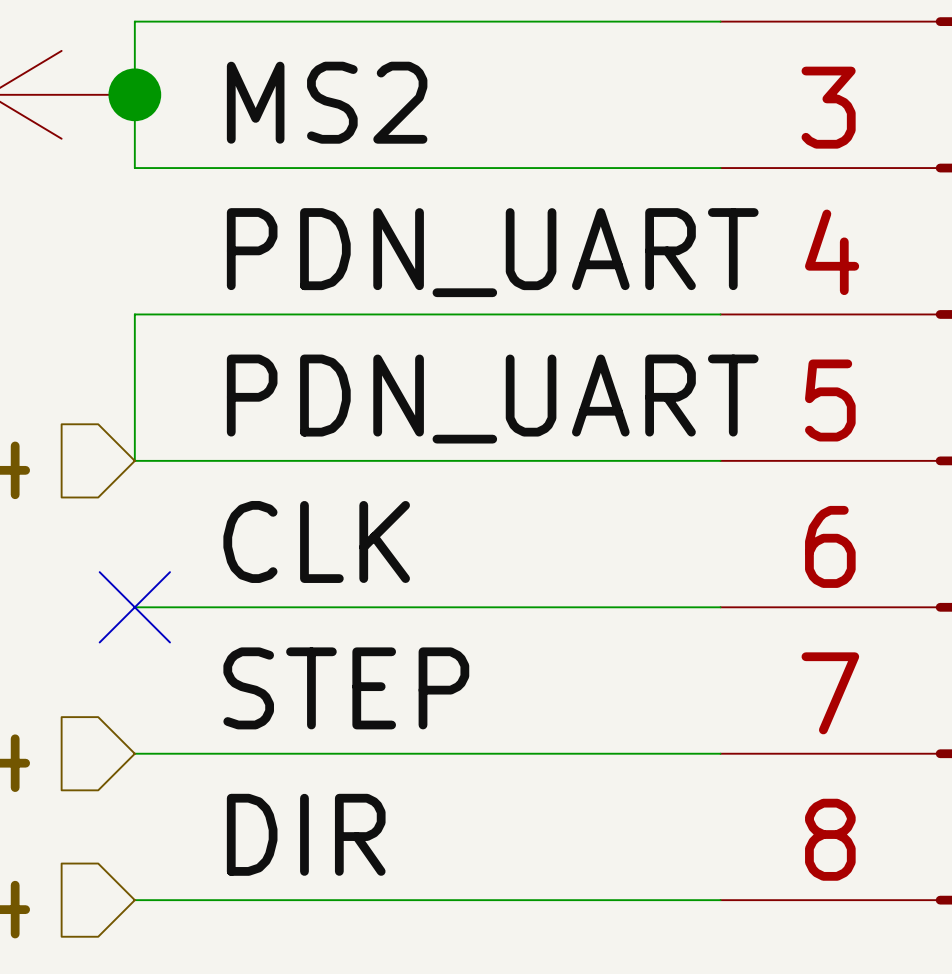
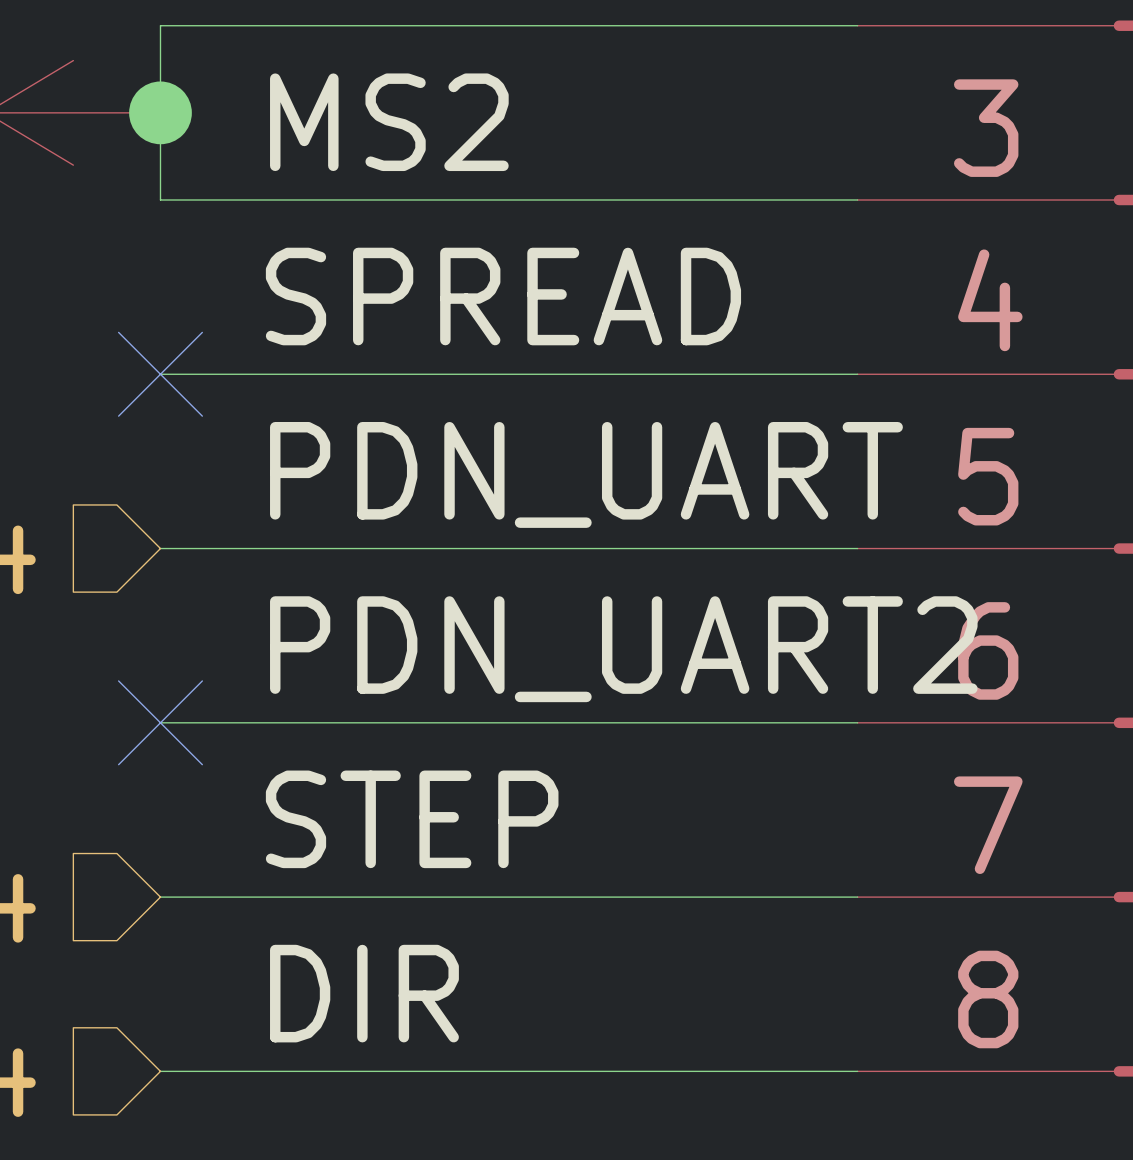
label: PDN_UART (492, 252) -> SPREAD (503, 296)
wire: (134, 314) (134, 460) -> none
no-connect mark: none -> (160, 374)
label: CLK (316, 541) -> PDN_UART2 (623, 649)

